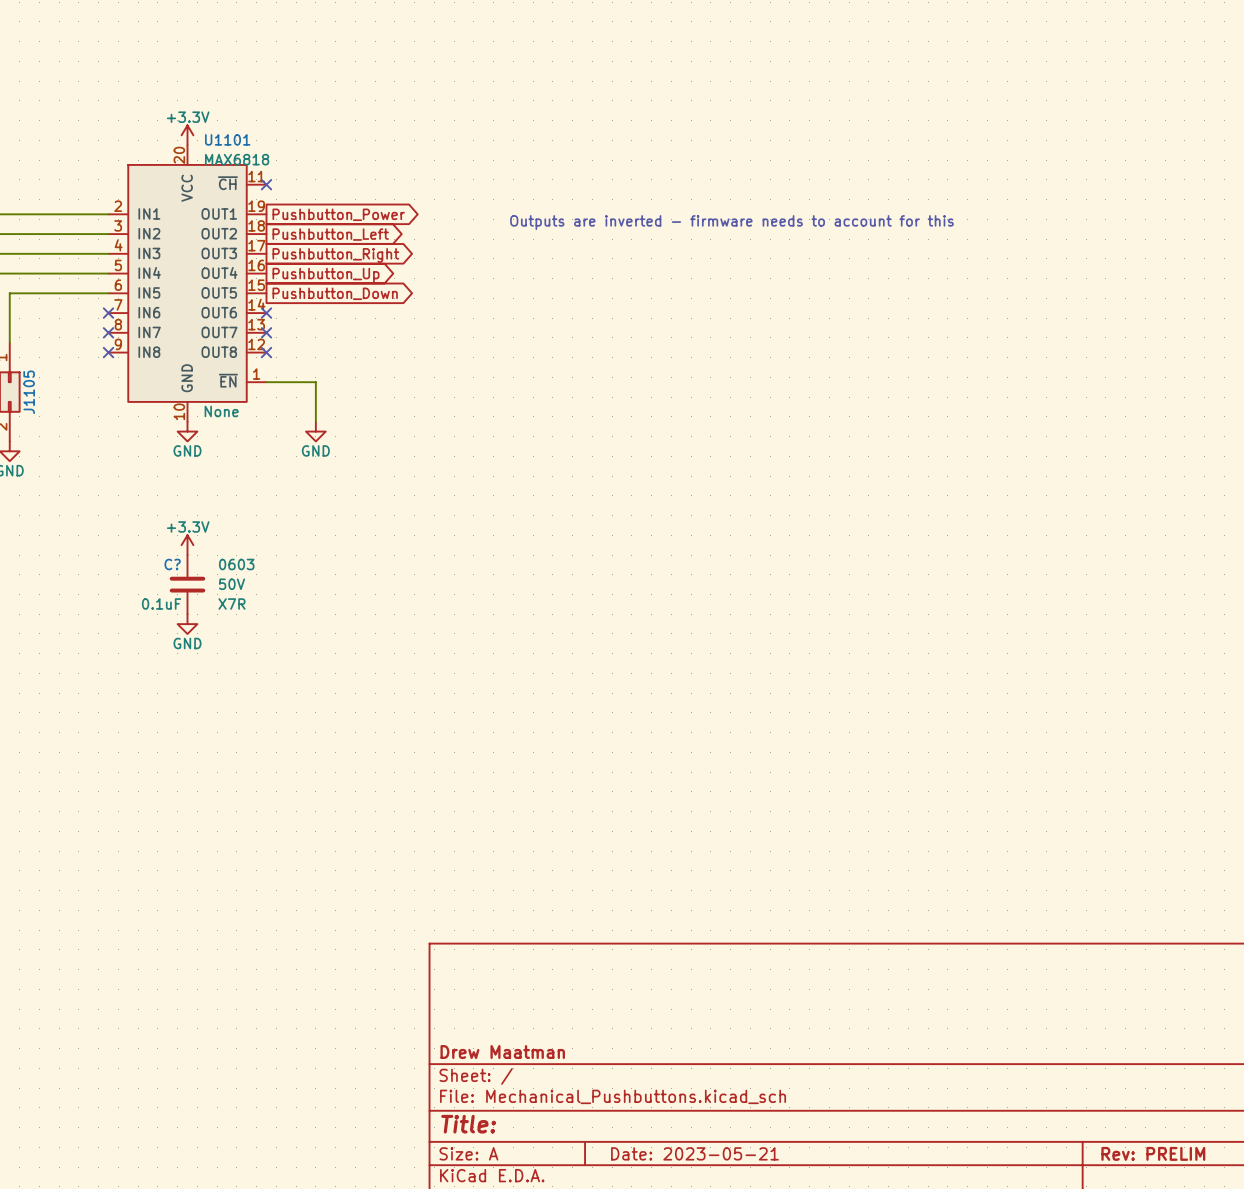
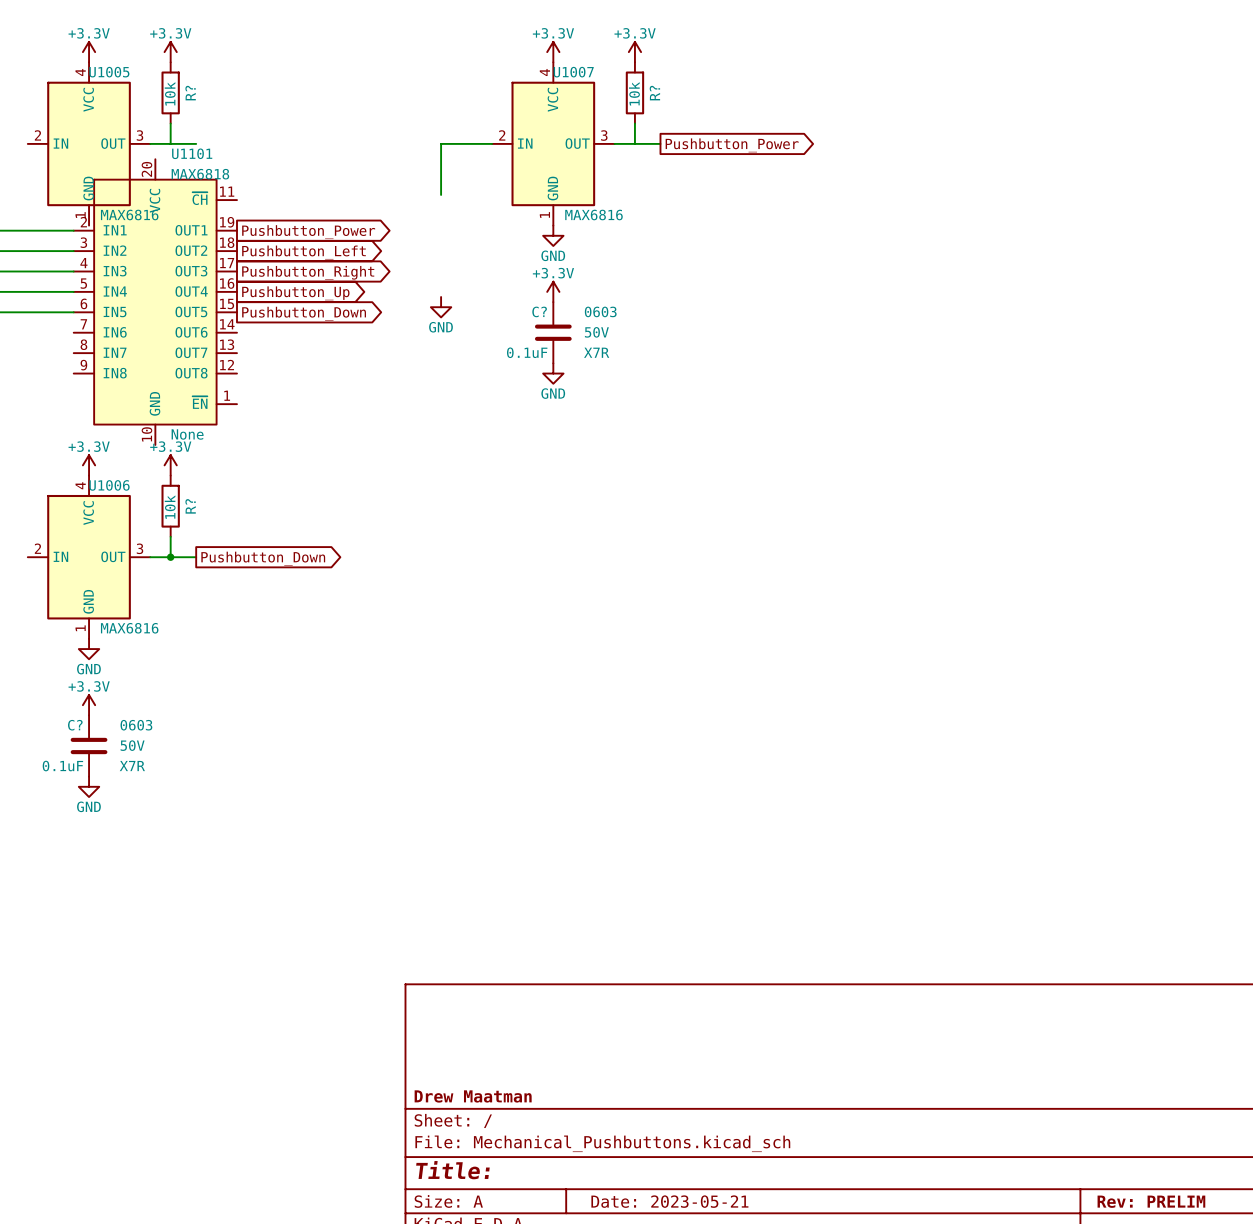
power symbol: none -> +3.3V (89, 52)
power symbol: none -> +3.3V (170, 52)
power symbol: none -> +3.3V (553, 52)
power symbol: none -> +3.3V (634, 52)
R?: none -> 10k (170, 92)
R?: none -> 10k (634, 92)
wire: none -> (170, 123) (170, 143)
wire: none -> (634, 123) (634, 143)
U1005: none -> MAX6816 (89, 143)
wire: none -> (150, 143) (196, 143)
wire: none -> (492, 143) (441, 143) (441, 194)
U1007: none -> MAX6816 (553, 143)
wire: none -> (614, 143) (660, 143)
global label: none -> Pushbutton_Power (732, 145)
power symbol: +3.3V (187, 135) -> none
no-connect mark: (266, 184) -> none
power symbol: none -> GND (553, 235)
text: Outputs are inverted - firmware needs to account for this (731, 222) -> none
power symbol: none -> +3.3V (553, 291)
power symbol: none -> GND (441, 307)
no-connect mark: (108, 313) -> none
no-connect mark: (266, 313) -> none
C?: none -> 0.1uF (553, 332)
no-connect mark: (108, 332) -> none
no-connect mark: (266, 332) -> none
no-connect mark: (108, 352) -> none
no-connect mark: (266, 352) -> none
power symbol: none -> GND (553, 373)
wire: (266, 382) (315, 382) (315, 421) -> none
power symbol: GND (187, 431) -> none
power symbol: GND (315, 431) -> none
power symbol: none -> +3.3V (89, 465)
power symbol: none -> +3.3V (170, 465)
R?: none -> 10k (170, 506)
wire: none -> (170, 536) (170, 557)
U1006: none -> MAX6816 (89, 557)
wire: none -> (150, 557) (196, 557)
junction: none -> (170, 557)
global label: none -> Pushbutton_Down (263, 558)
power symbol: +3.3V (187, 545) -> none
C? position: (187, 584) -> (89, 746)
power symbol position: GND (187, 624) -> GND (89, 649)
power symbol: none -> +3.3V (89, 705)
power symbol: none -> GND (89, 786)

